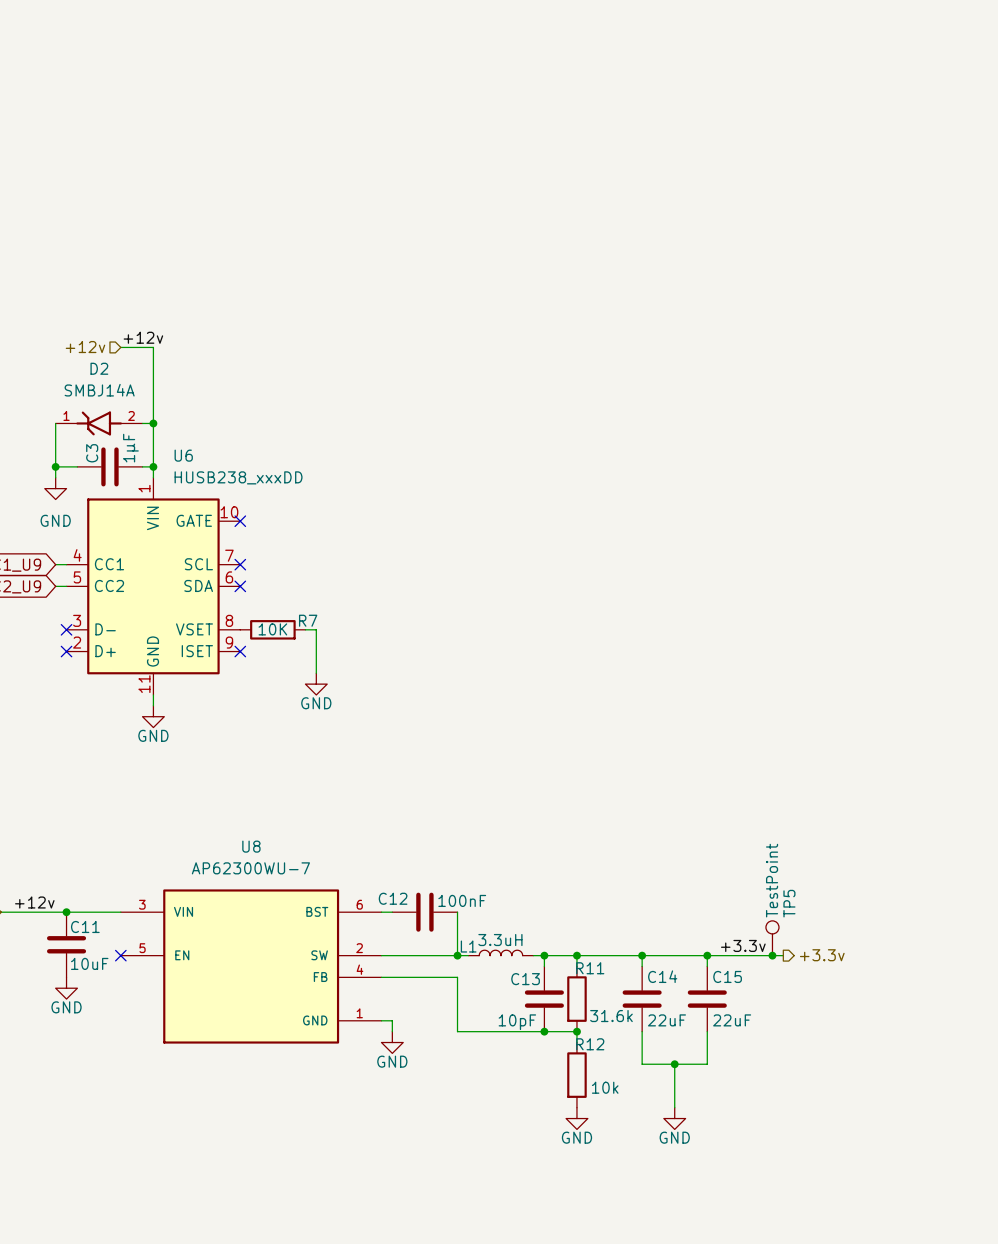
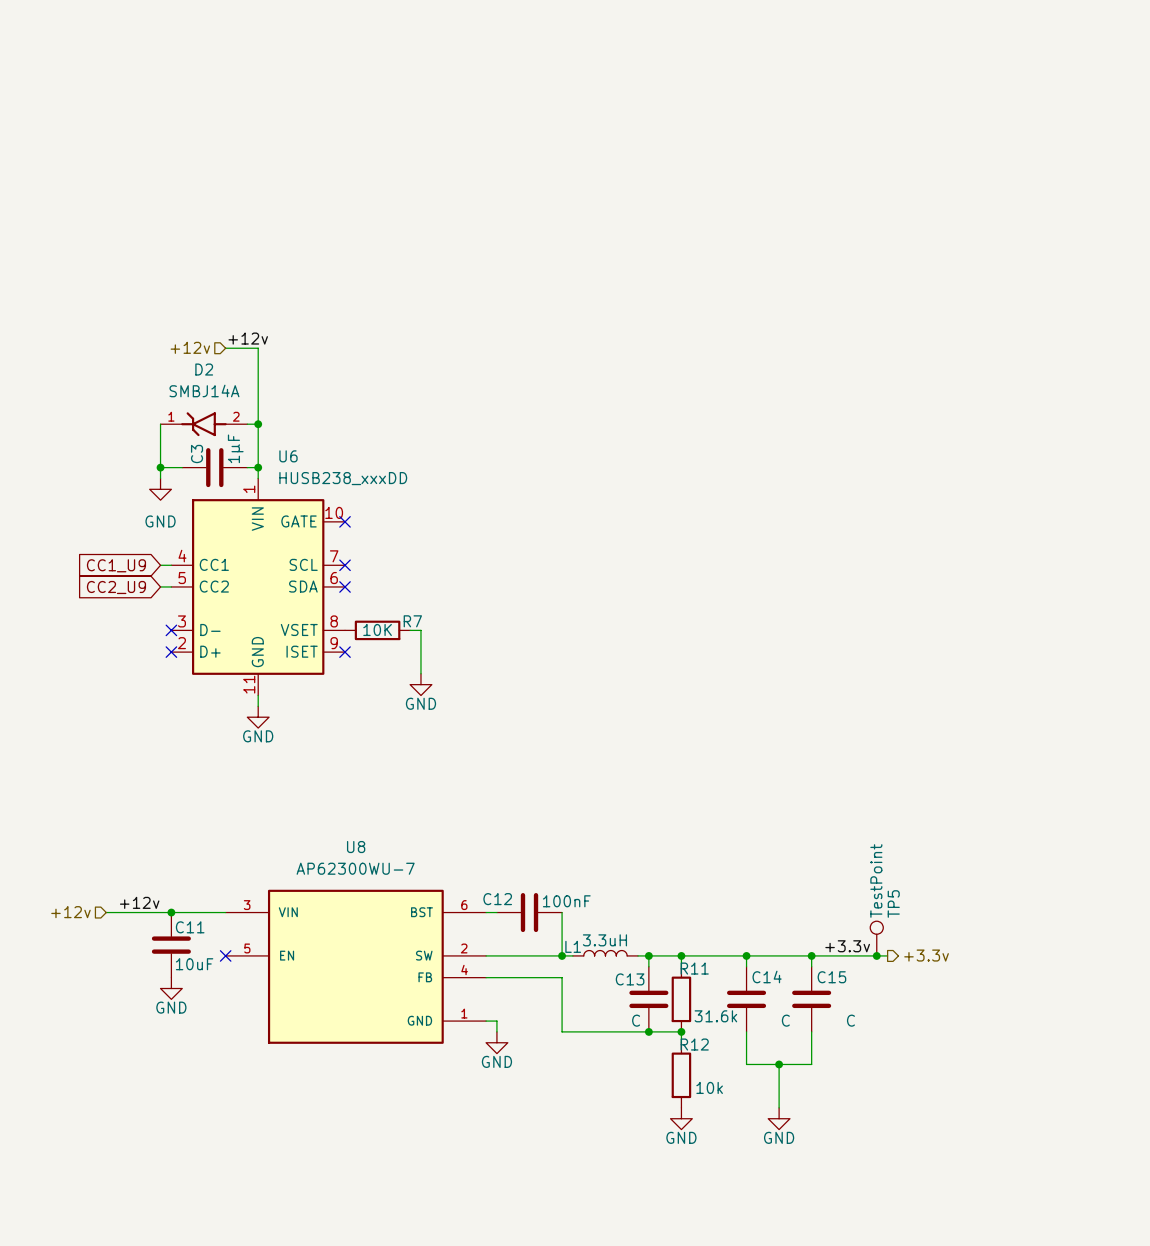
C14 value: 22uF (666, 1020) -> C (785, 1020)
C15 value: 22uF (732, 1020) -> C (850, 1020)
C13 value: 10pF (517, 1022) -> C (636, 1020)

